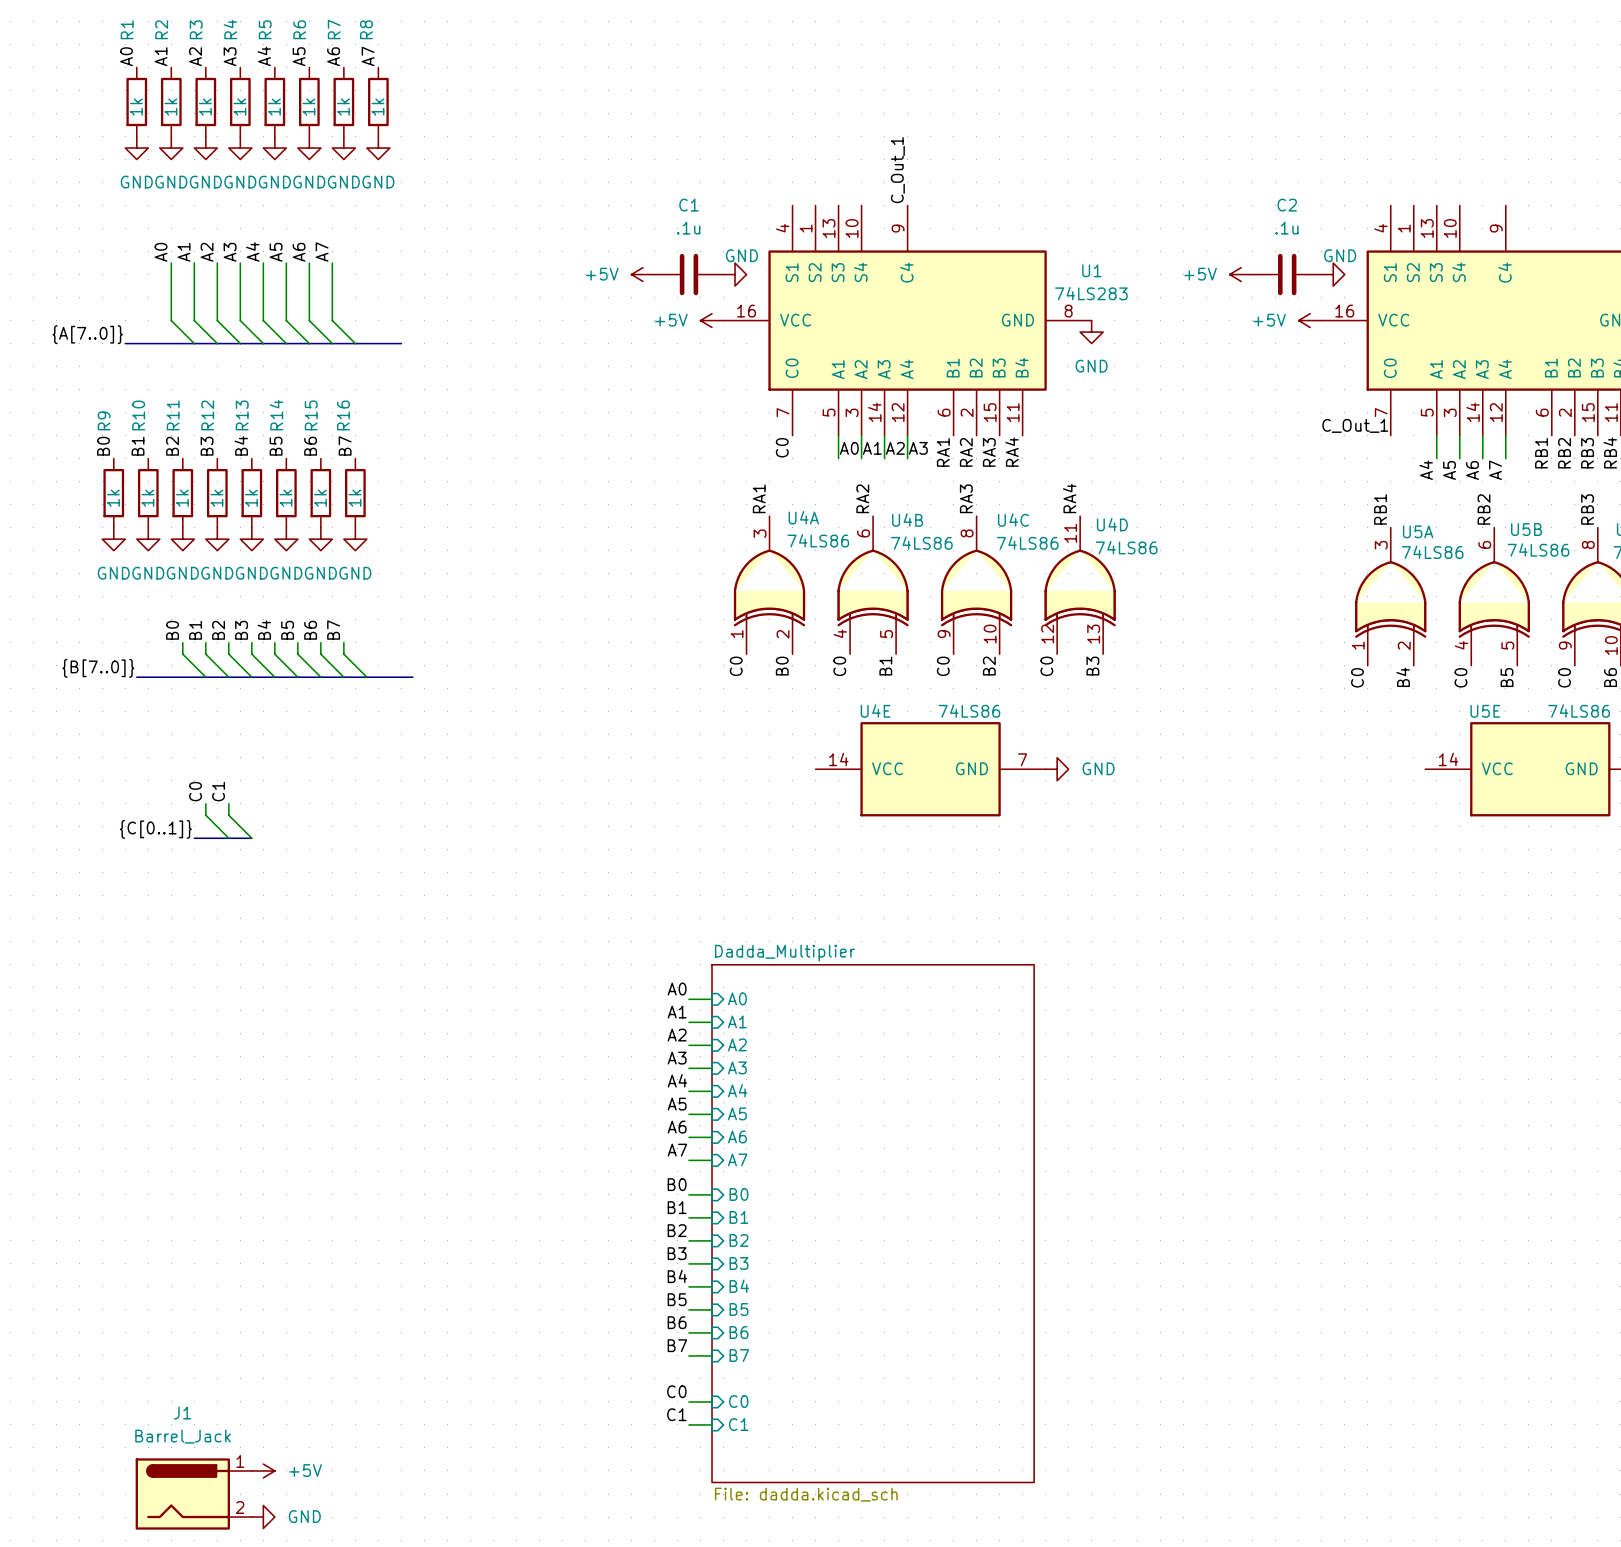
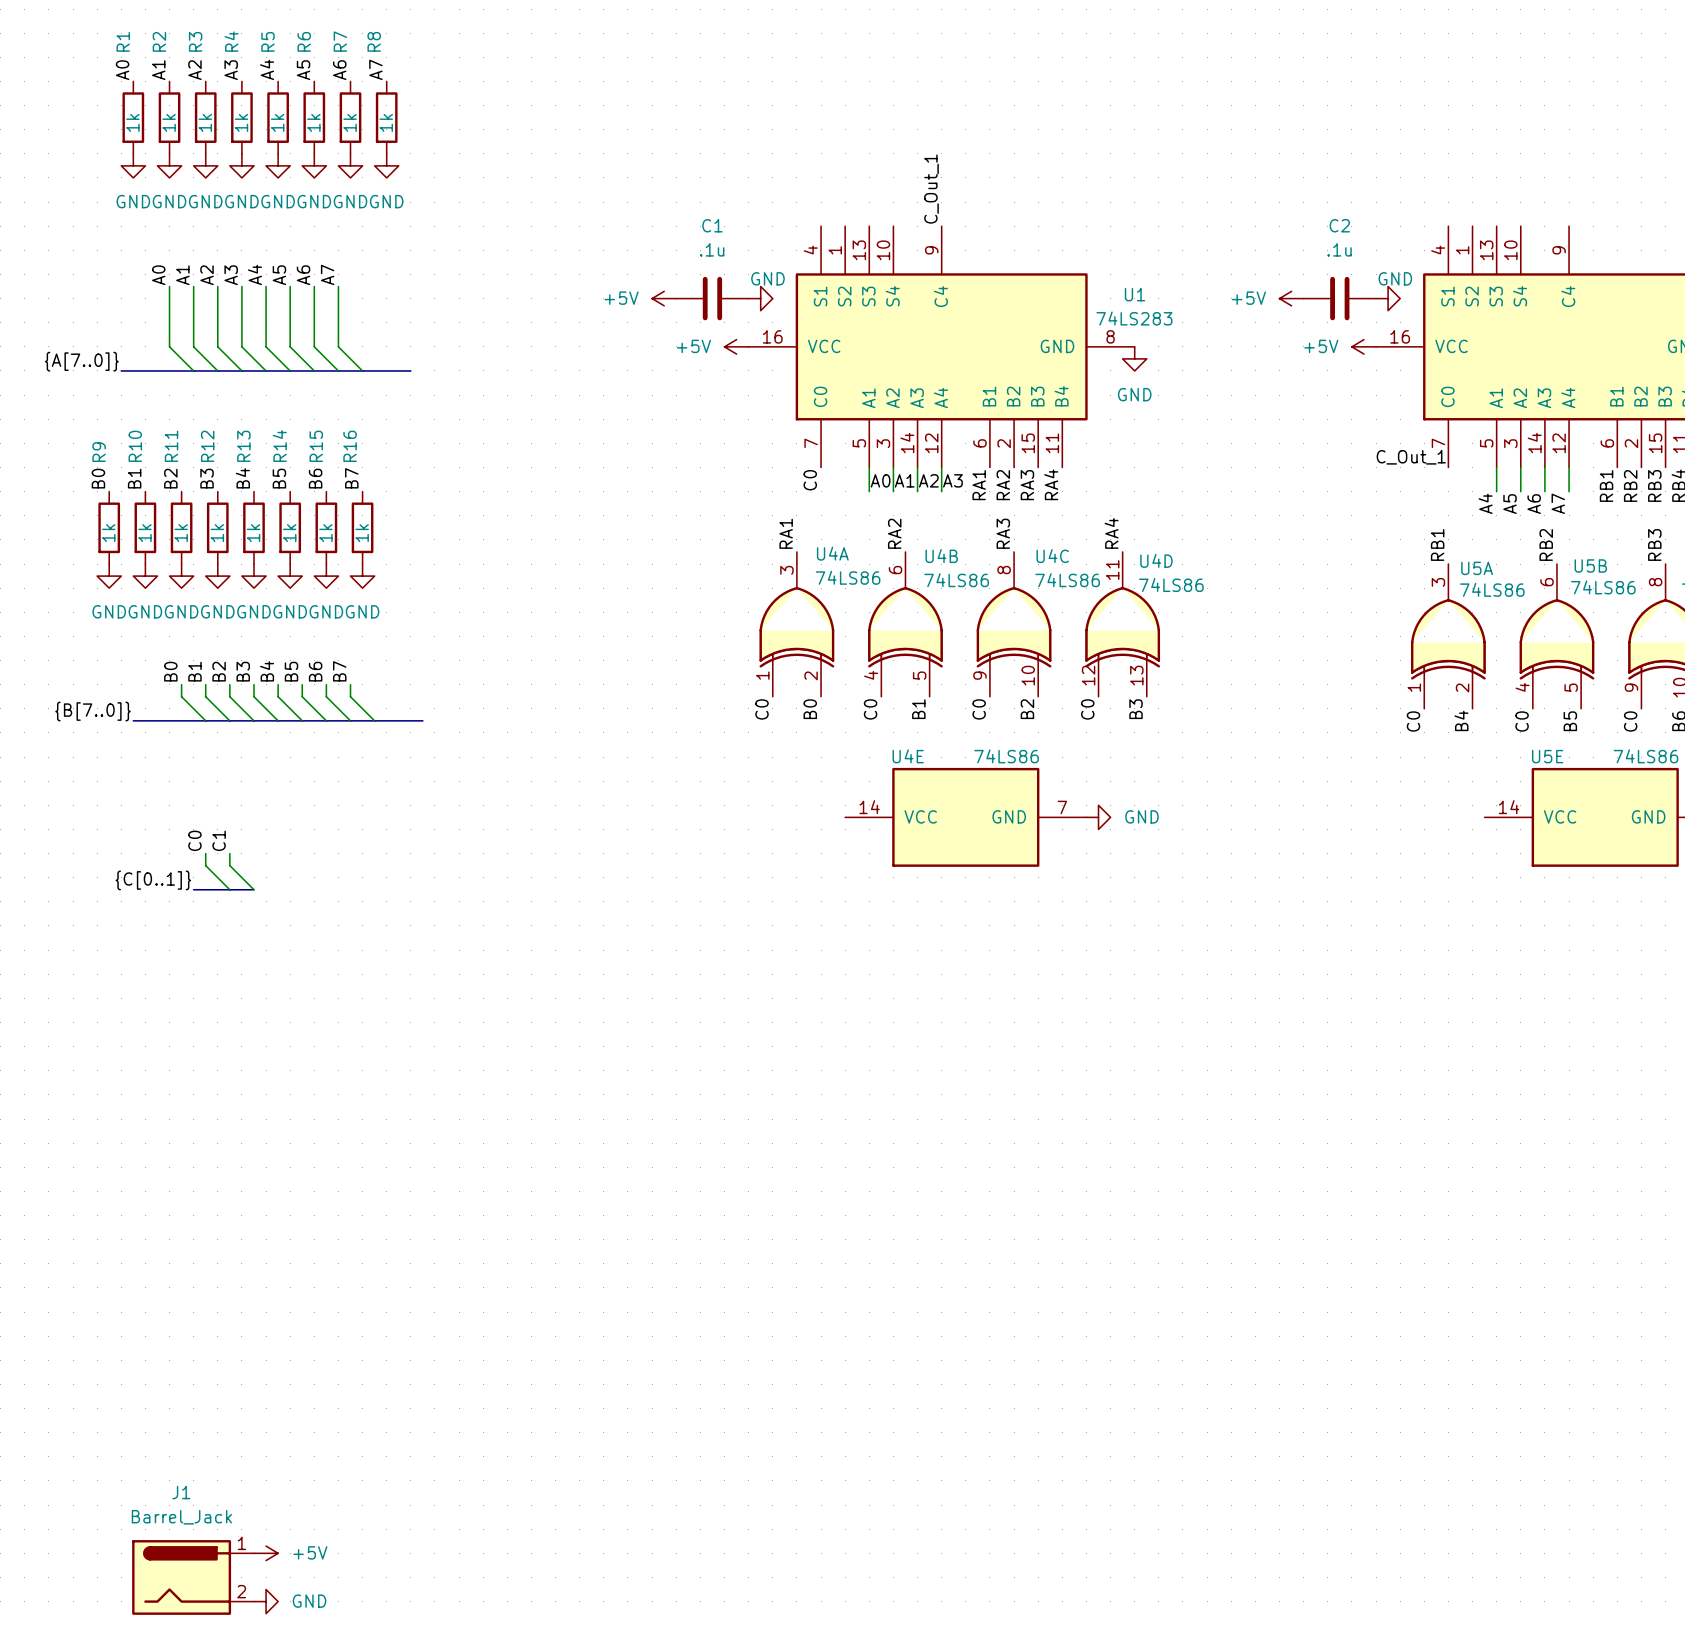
label: A0 (677, 989) -> none
sheet pin: A0 (737, 998) -> none
wire: (688, 999) (712, 999) -> none
label: A1 (677, 1012) -> none
sheet pin: A1 (737, 1021) -> none
wire: (688, 1022) (712, 1022) -> none
label: A2 (677, 1035) -> none
sheet pin: A2 (737, 1044) -> none
wire: (688, 1045) (712, 1045) -> none
label: A3 (677, 1058) -> none
sheet pin: A3 (737, 1067) -> none
wire: (688, 1068) (712, 1068) -> none
label: A4 (677, 1080) -> none
sheet pin: A4 (737, 1090) -> none
wire: (688, 1091) (712, 1091) -> none
label: A5 (677, 1104) -> none
sheet pin: A5 (737, 1113) -> none
wire: (688, 1114) (712, 1114) -> none
label: A6 (677, 1127) -> none
sheet pin: A6 (737, 1136) -> none
wire: (688, 1137) (712, 1137) -> none
label: A7 (677, 1150) -> none
sheet pin: A7 (737, 1159) -> none
wire: (688, 1160) (712, 1160) -> none
label: B0 (677, 1184) -> none
wire: (688, 1194) (712, 1194) -> none
sheet pin: B0 (739, 1194) -> none
label: B1 (677, 1207) -> none
wire: (688, 1217) (712, 1217) -> none
sheet pin: B1 (739, 1217) -> none
sheet Dadda_Multiplier: File: dadda.kicad_sch (873, 1223) -> none
label: B2 (677, 1230) -> none
wire: (688, 1240) (712, 1240) -> none
sheet pin: B2 (739, 1240) -> none
label: B3 (677, 1253) -> none
wire: (688, 1263) (712, 1263) -> none
sheet pin: B3 (739, 1263) -> none
label: B4 (677, 1276) -> none
wire: (688, 1286) (712, 1286) -> none
sheet pin: B4 (739, 1286) -> none
label: B5 (677, 1299) -> none
wire: (688, 1309) (712, 1309) -> none
sheet pin: B5 (739, 1309) -> none
label: B6 (677, 1322) -> none
wire: (688, 1332) (712, 1332) -> none
sheet pin: B6 (739, 1332) -> none
label: B7 (677, 1345) -> none
wire: (688, 1355) (712, 1355) -> none
sheet pin: B7 (739, 1355) -> none
label: C0 (676, 1391) -> none
wire: (688, 1401) (712, 1401) -> none
sheet pin: C0 (738, 1401) -> none
label: C1 (676, 1414) -> none
wire: (688, 1424) (712, 1424) -> none
sheet pin: C1 (738, 1424) -> none

